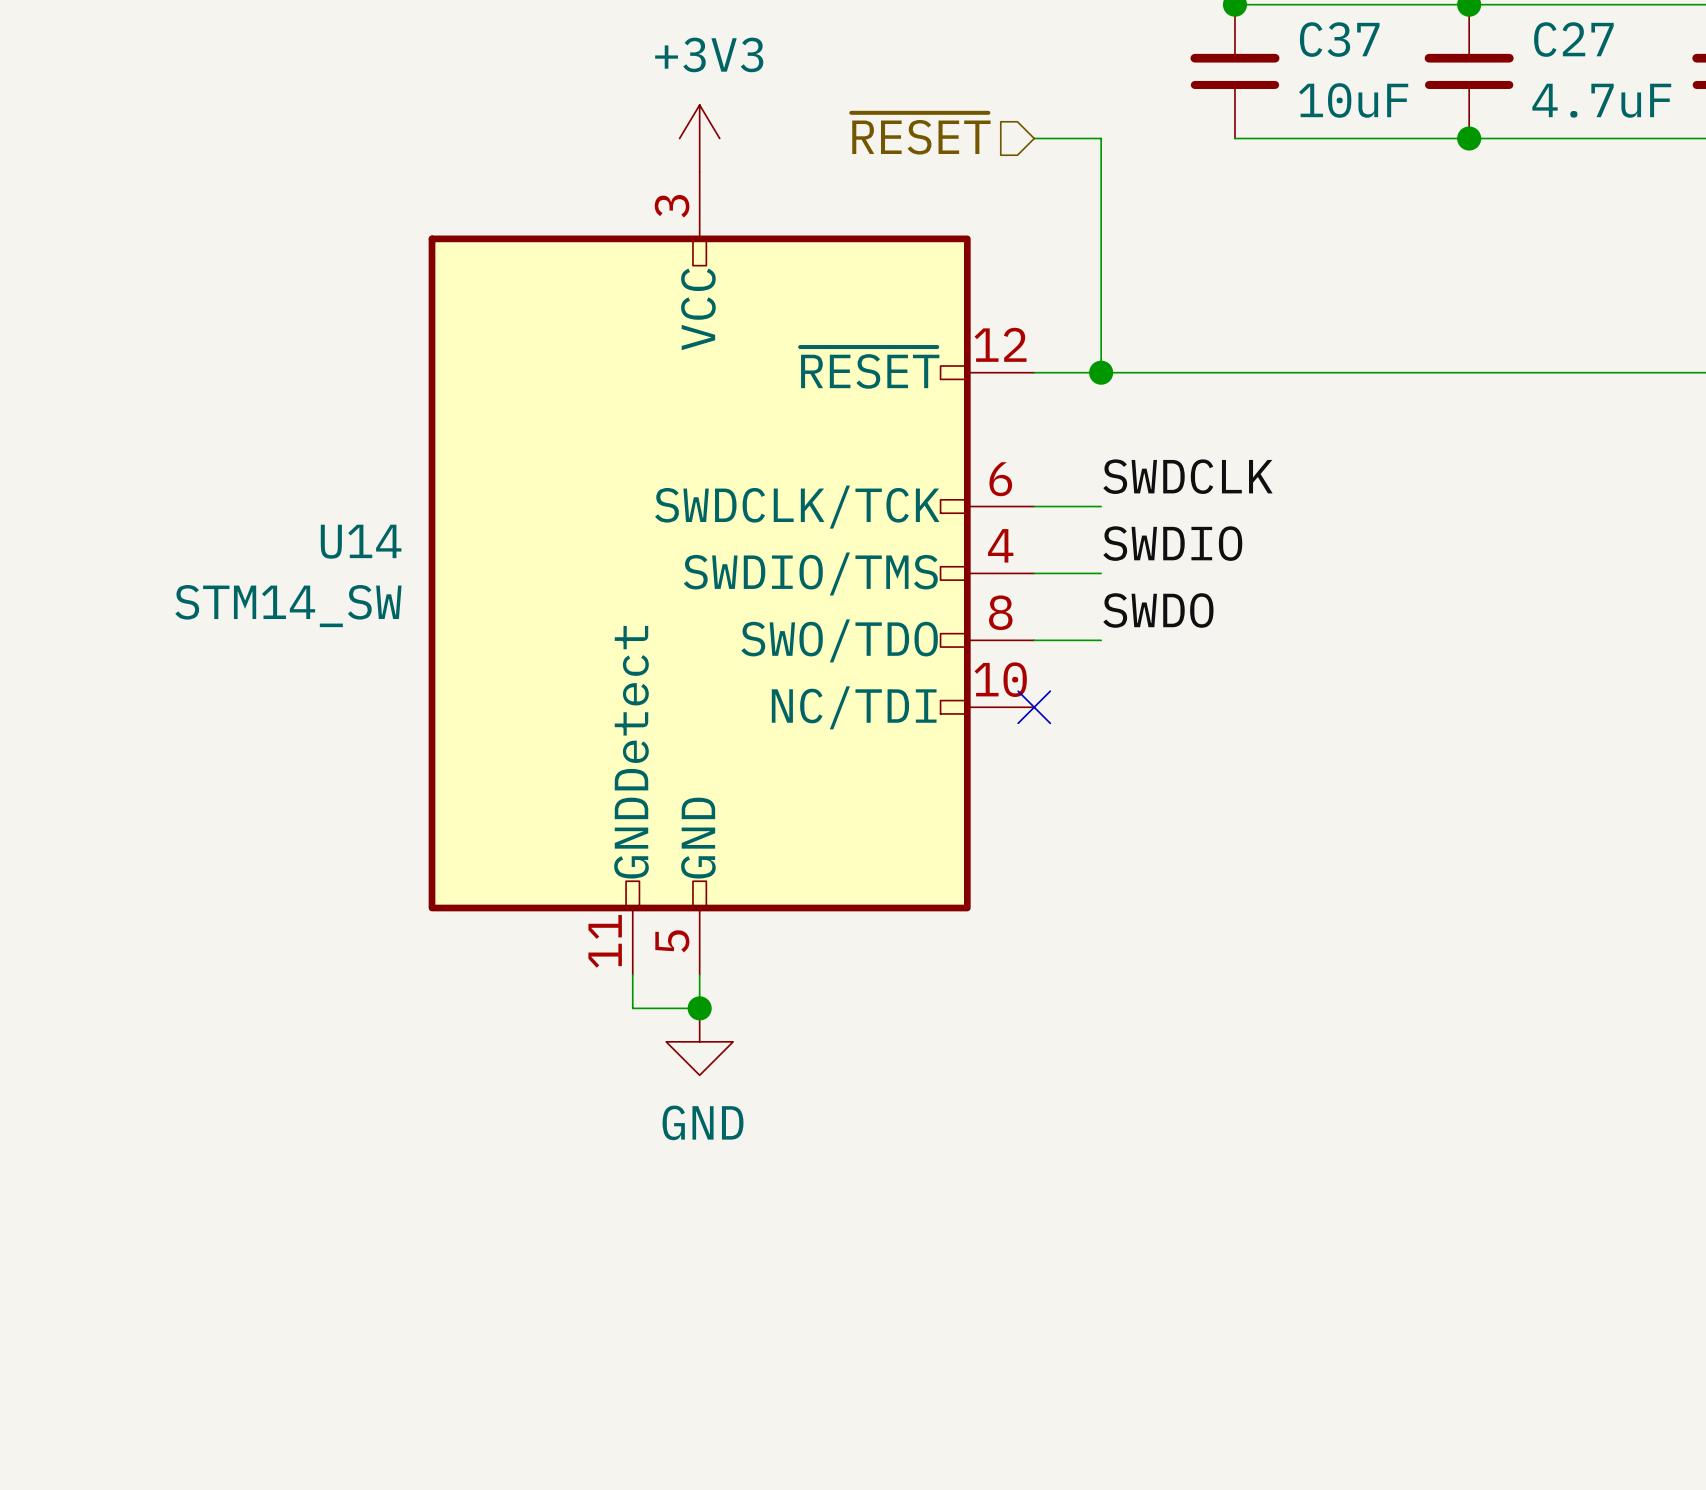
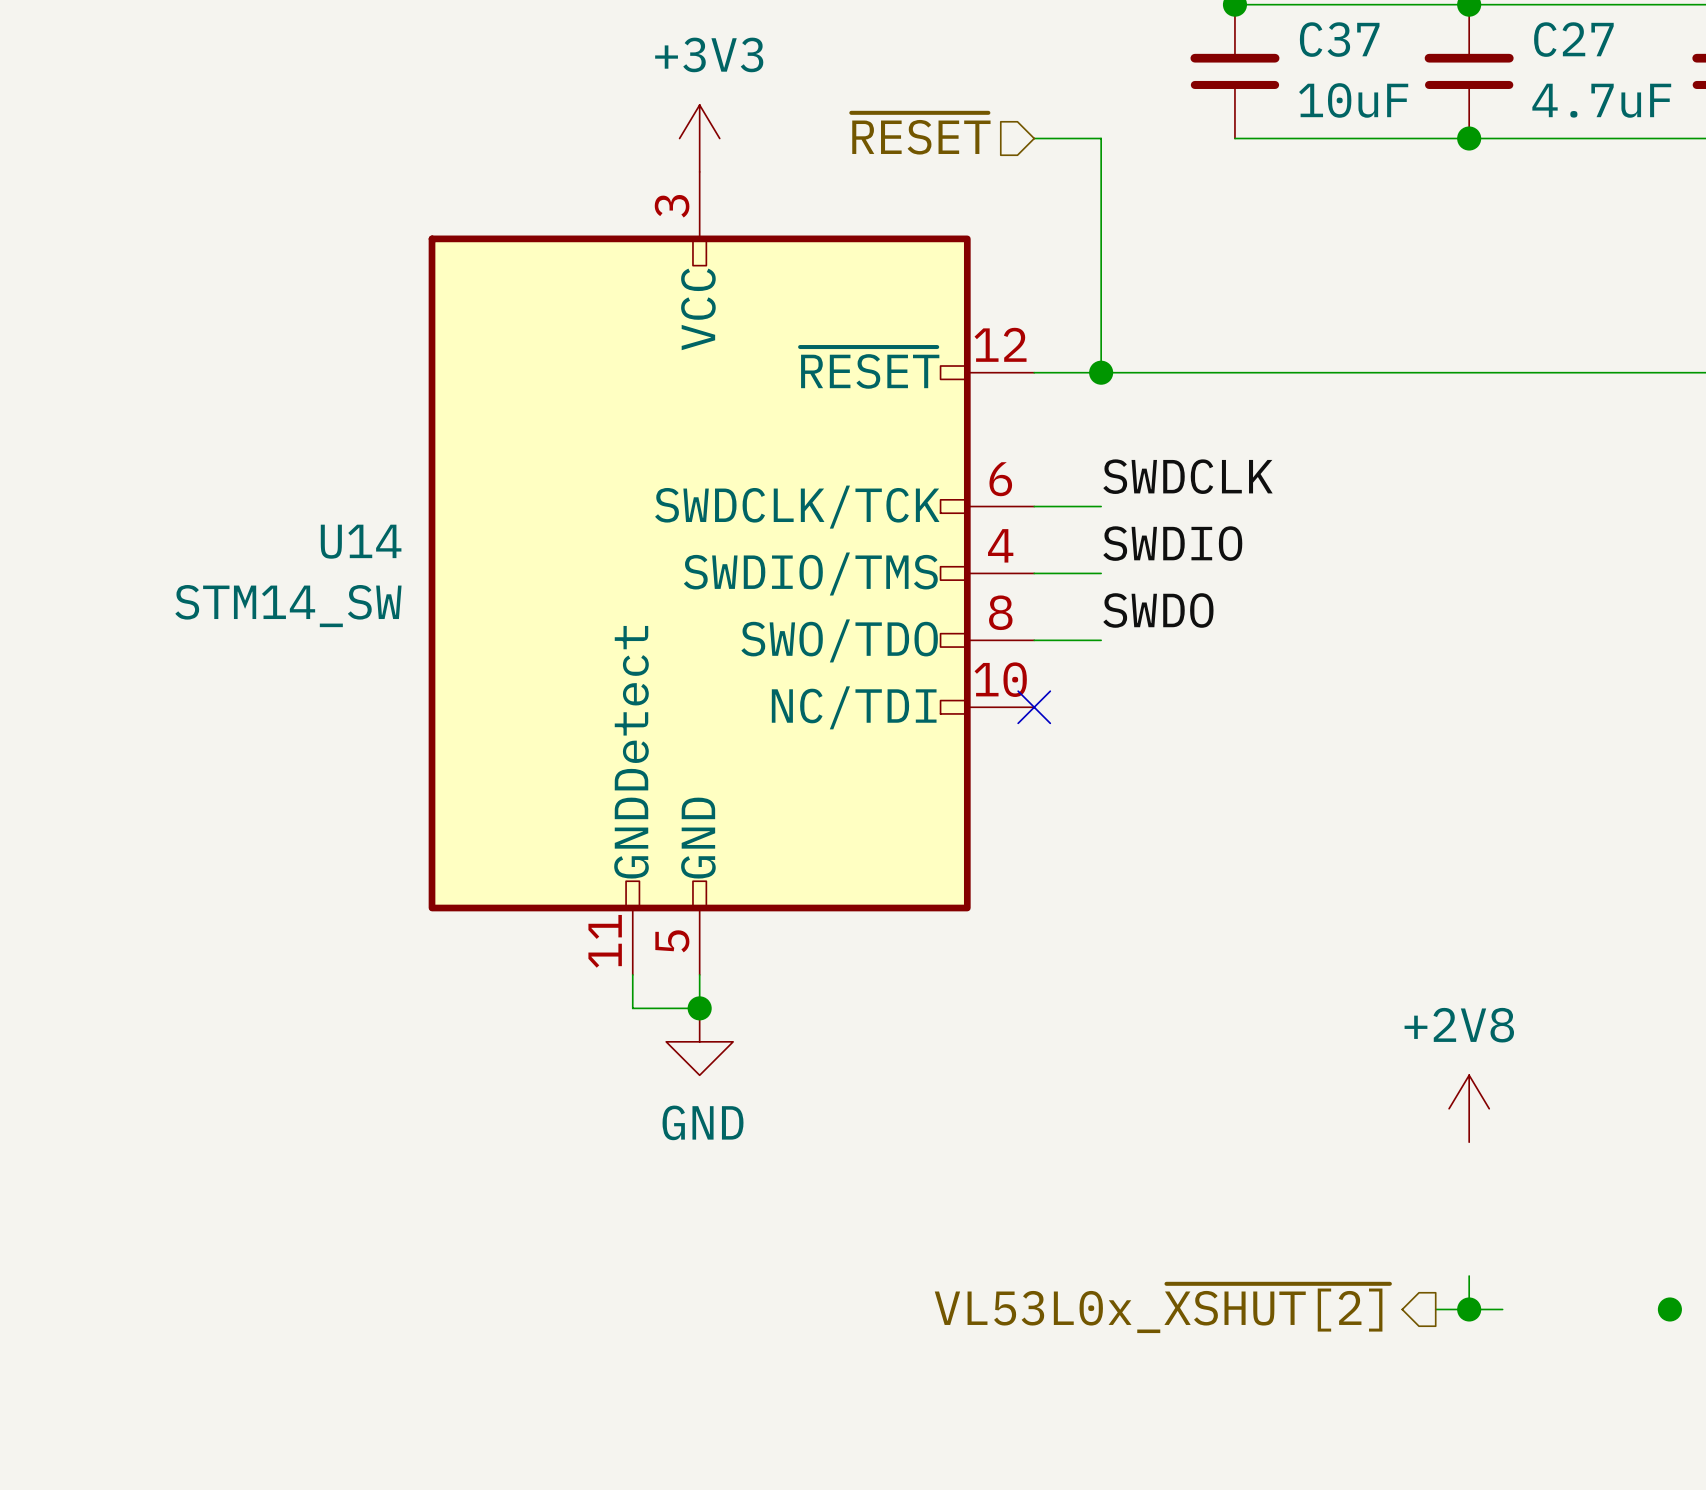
power symbol: none -> +2V8 (1469, 1108)
wire: none -> (1469, 1276) (1469, 1309)
hierarchical label: none -> VL53L0x_~{XSHUT[2]} (1162, 1308)
wire: none -> (1435, 1309) (1502, 1309)
junction: none -> (1469, 1309)
junction: none -> (1669, 1309)

